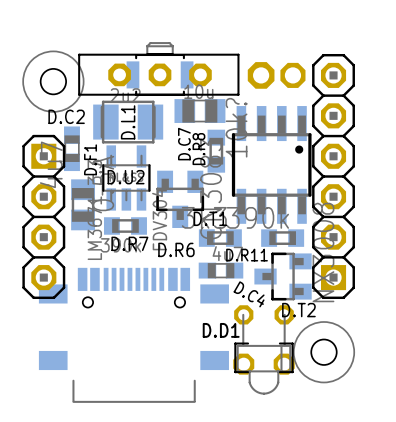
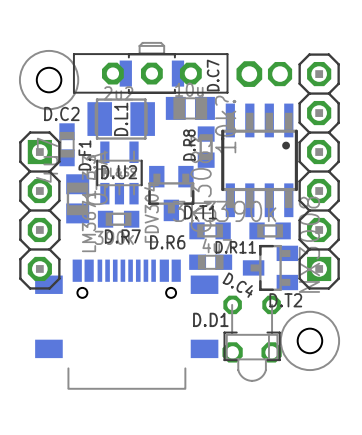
D.C7 name position: D.C7 (184, 144) -> D.C7 (213, 75)

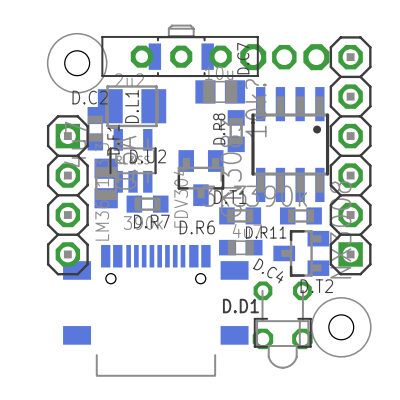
part footprint: [236, 61, 293, 87] -> [240, 44, 330, 71]
D.L1 position: (121, 119) -> (132, 106)
D.U2 position: (119, 172) -> (133, 160)

